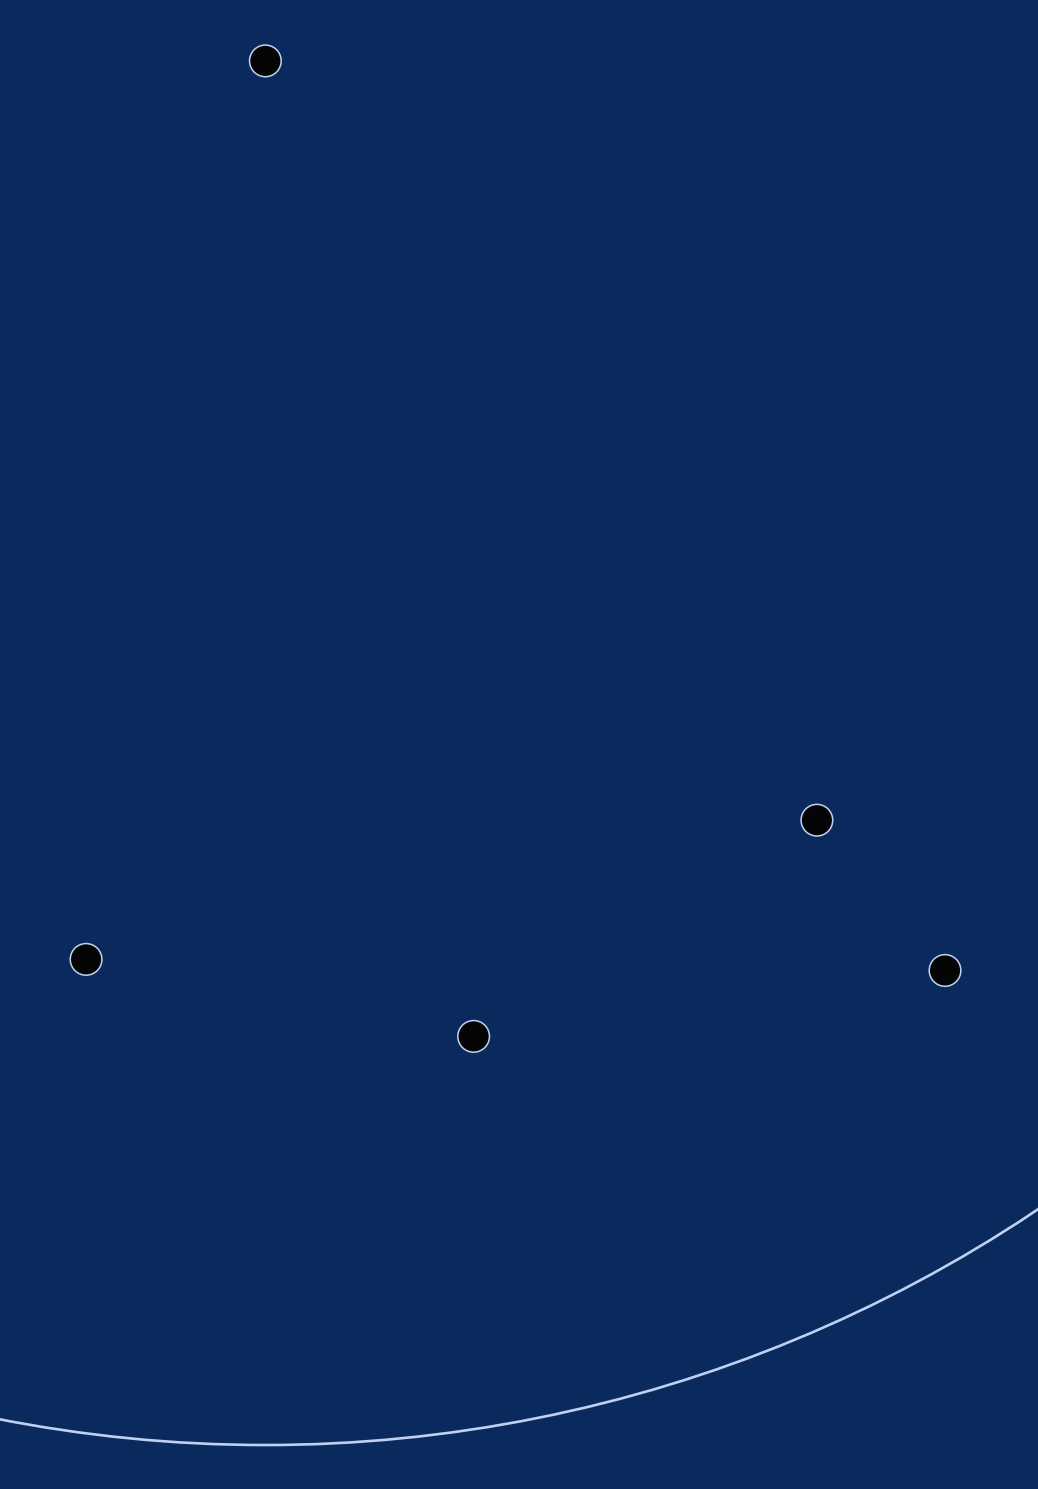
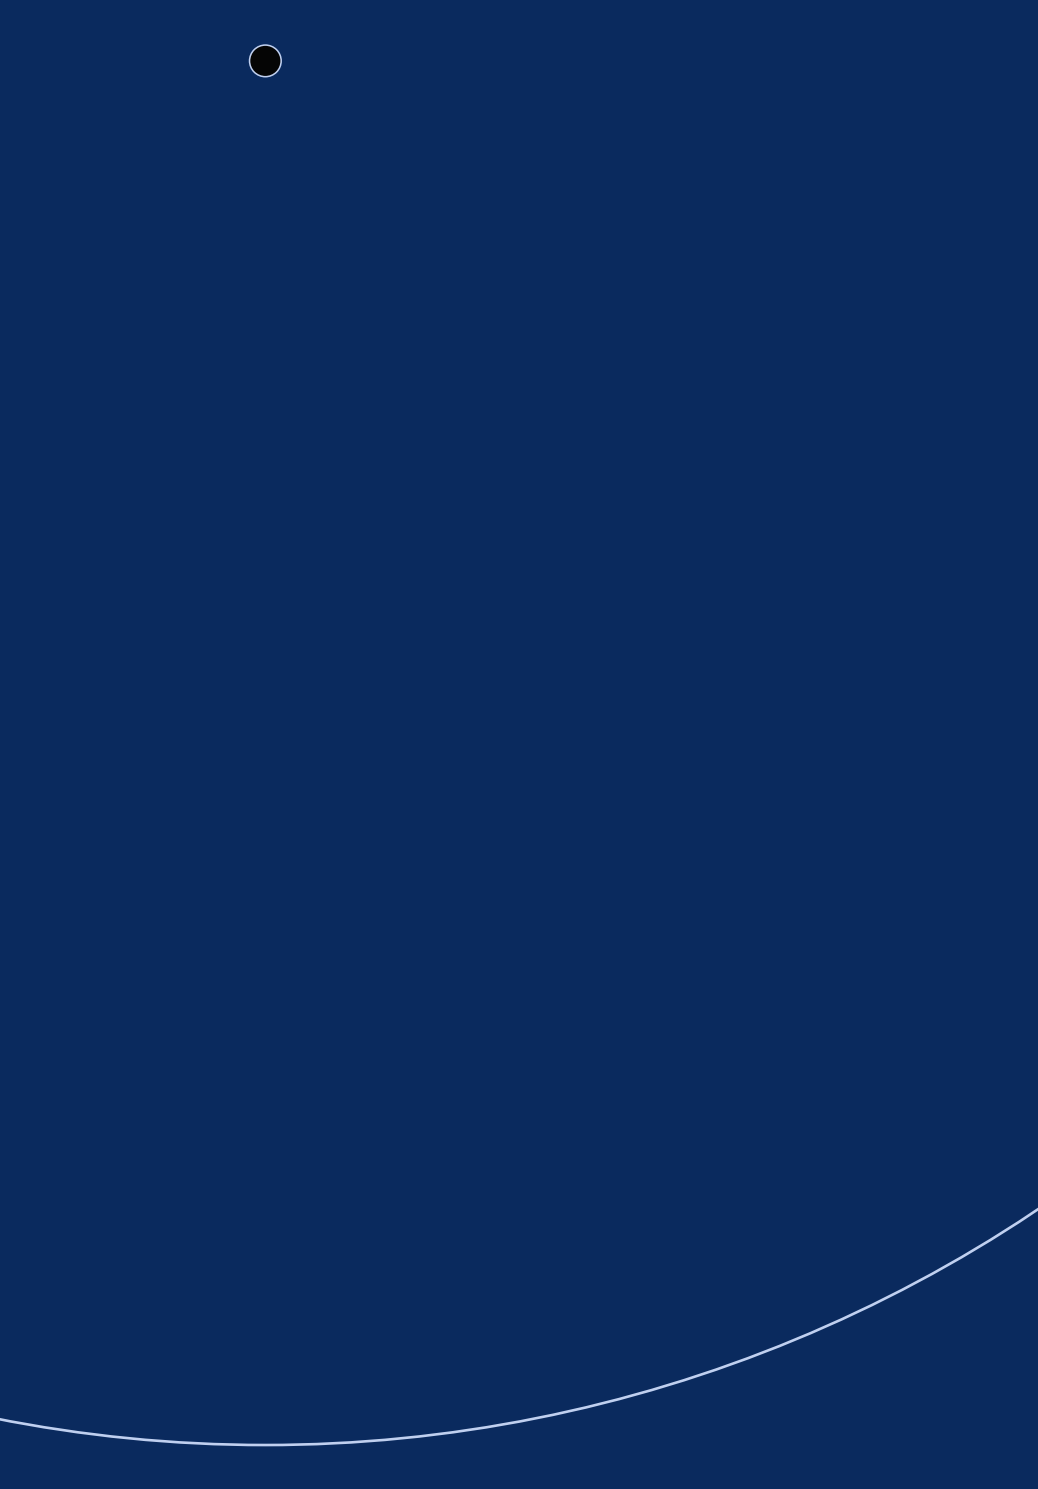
part: (816, 820) -> none
part: (86, 959) -> none
part: (945, 970) -> none
part: (473, 1036) -> none

